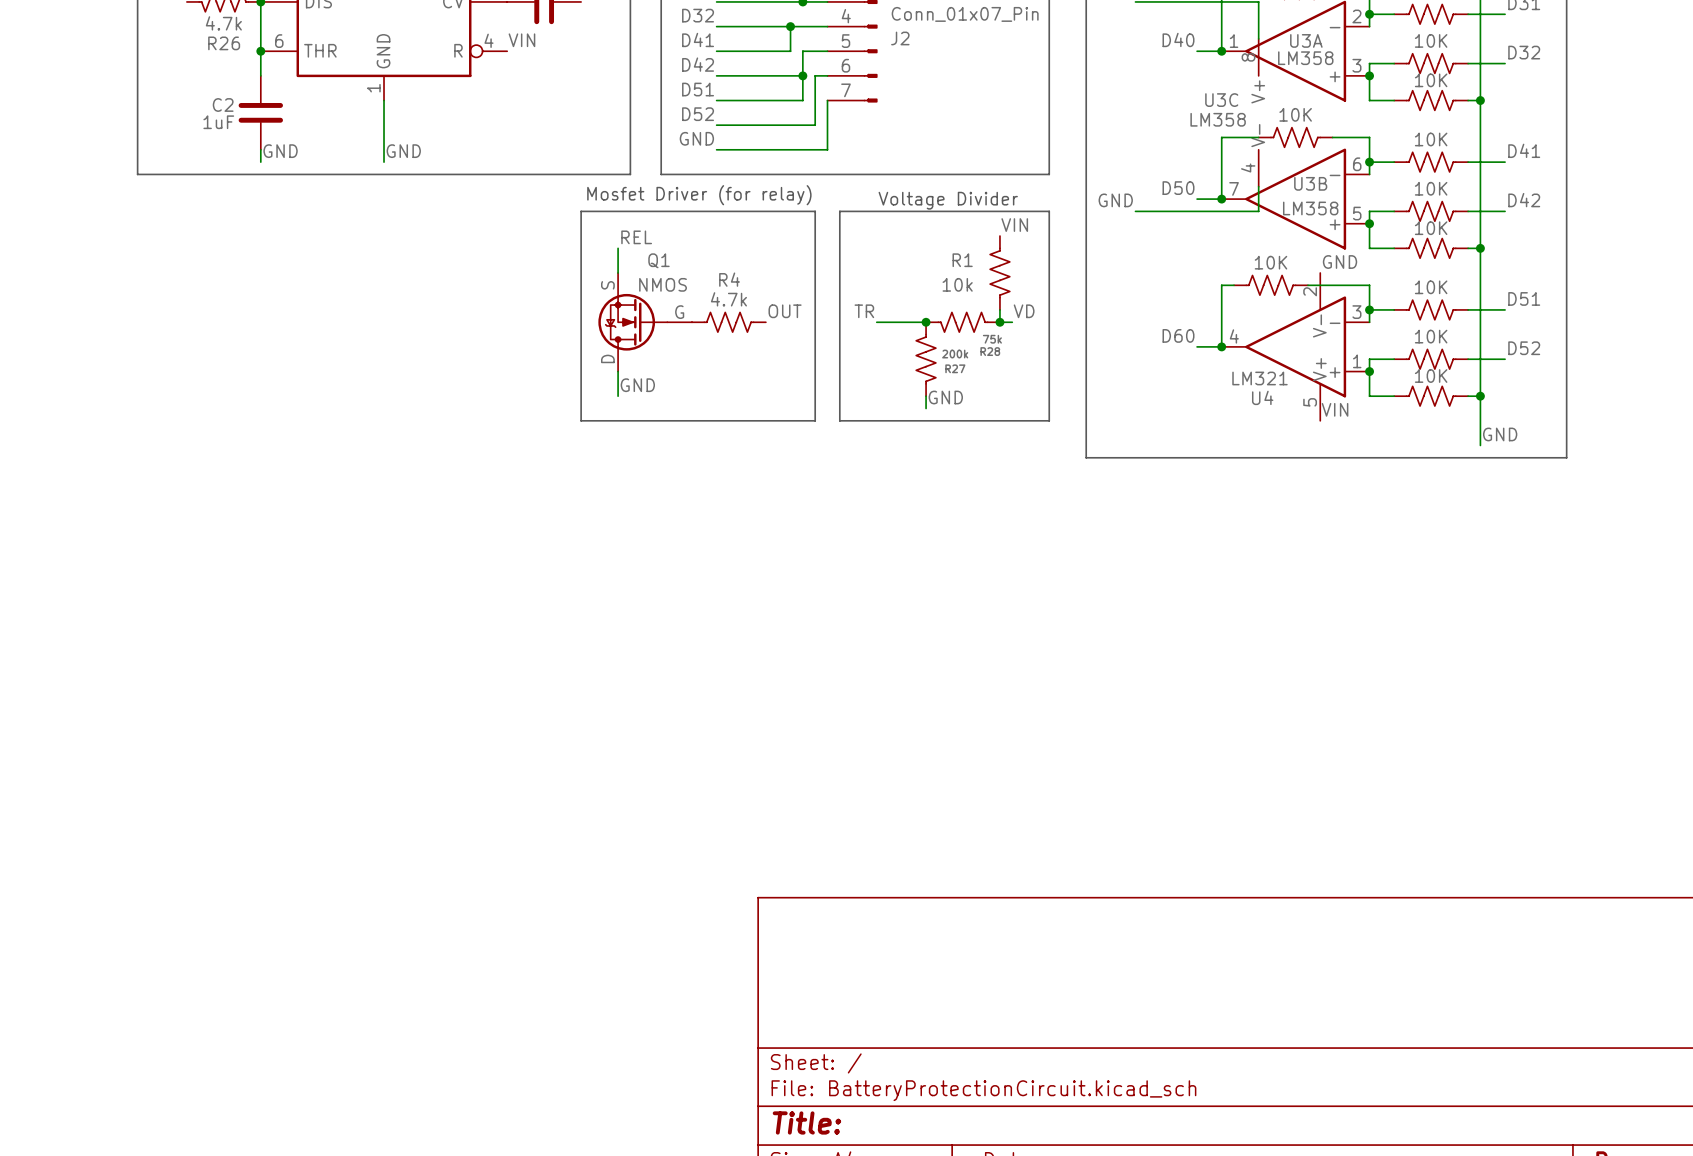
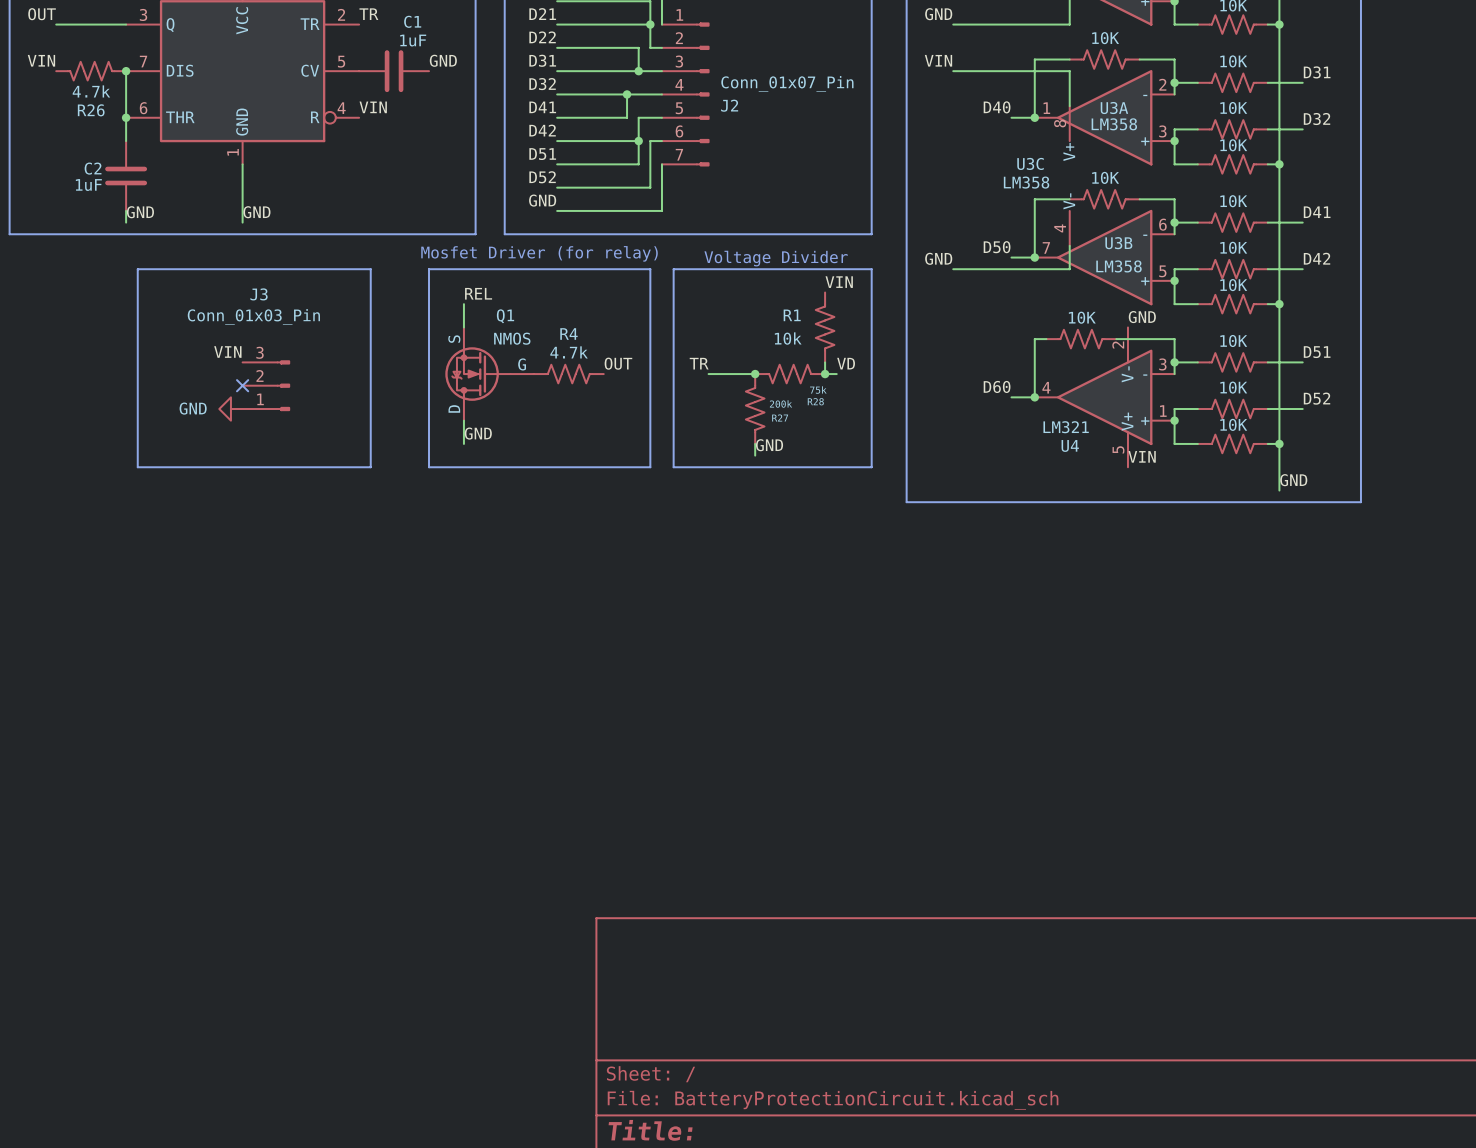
line: none -> (137, 269) (370, 269) (370, 467) (137, 467) (137, 269)
label: none -> VIN (227, 352)
no-connect mark: none -> (242, 385)
J3: none -> Conn_01x03_Pin (266, 385)
power symbol: none -> GND (230, 409)

